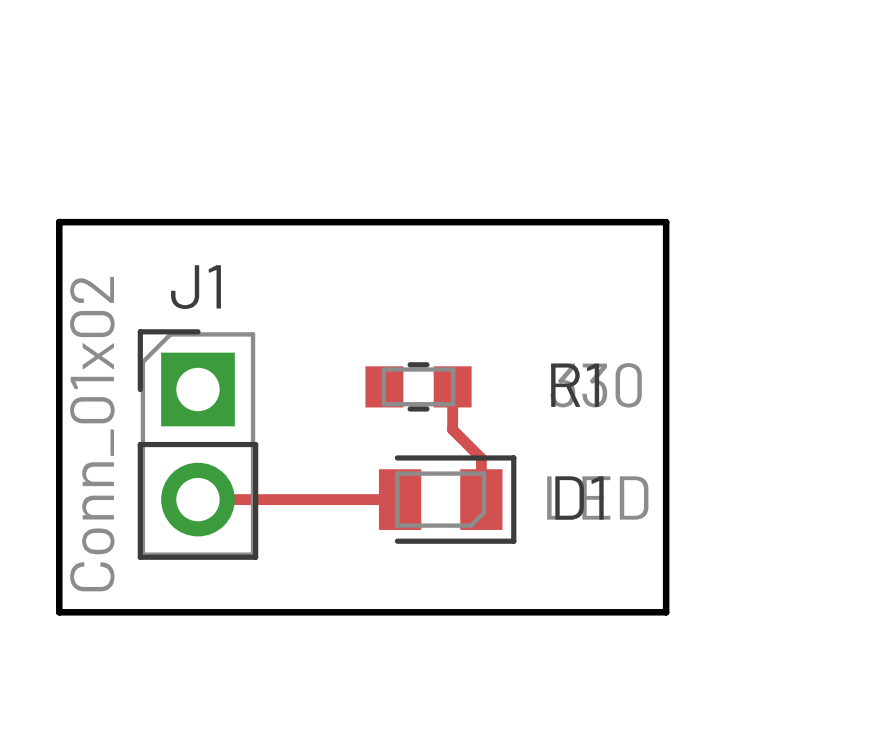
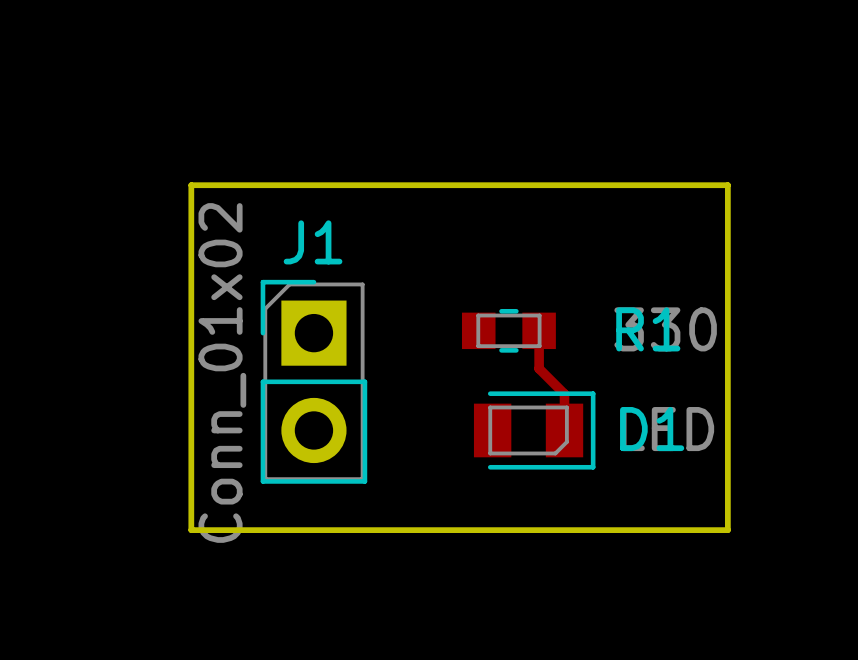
track: (197, 499) (400, 499) -> none

